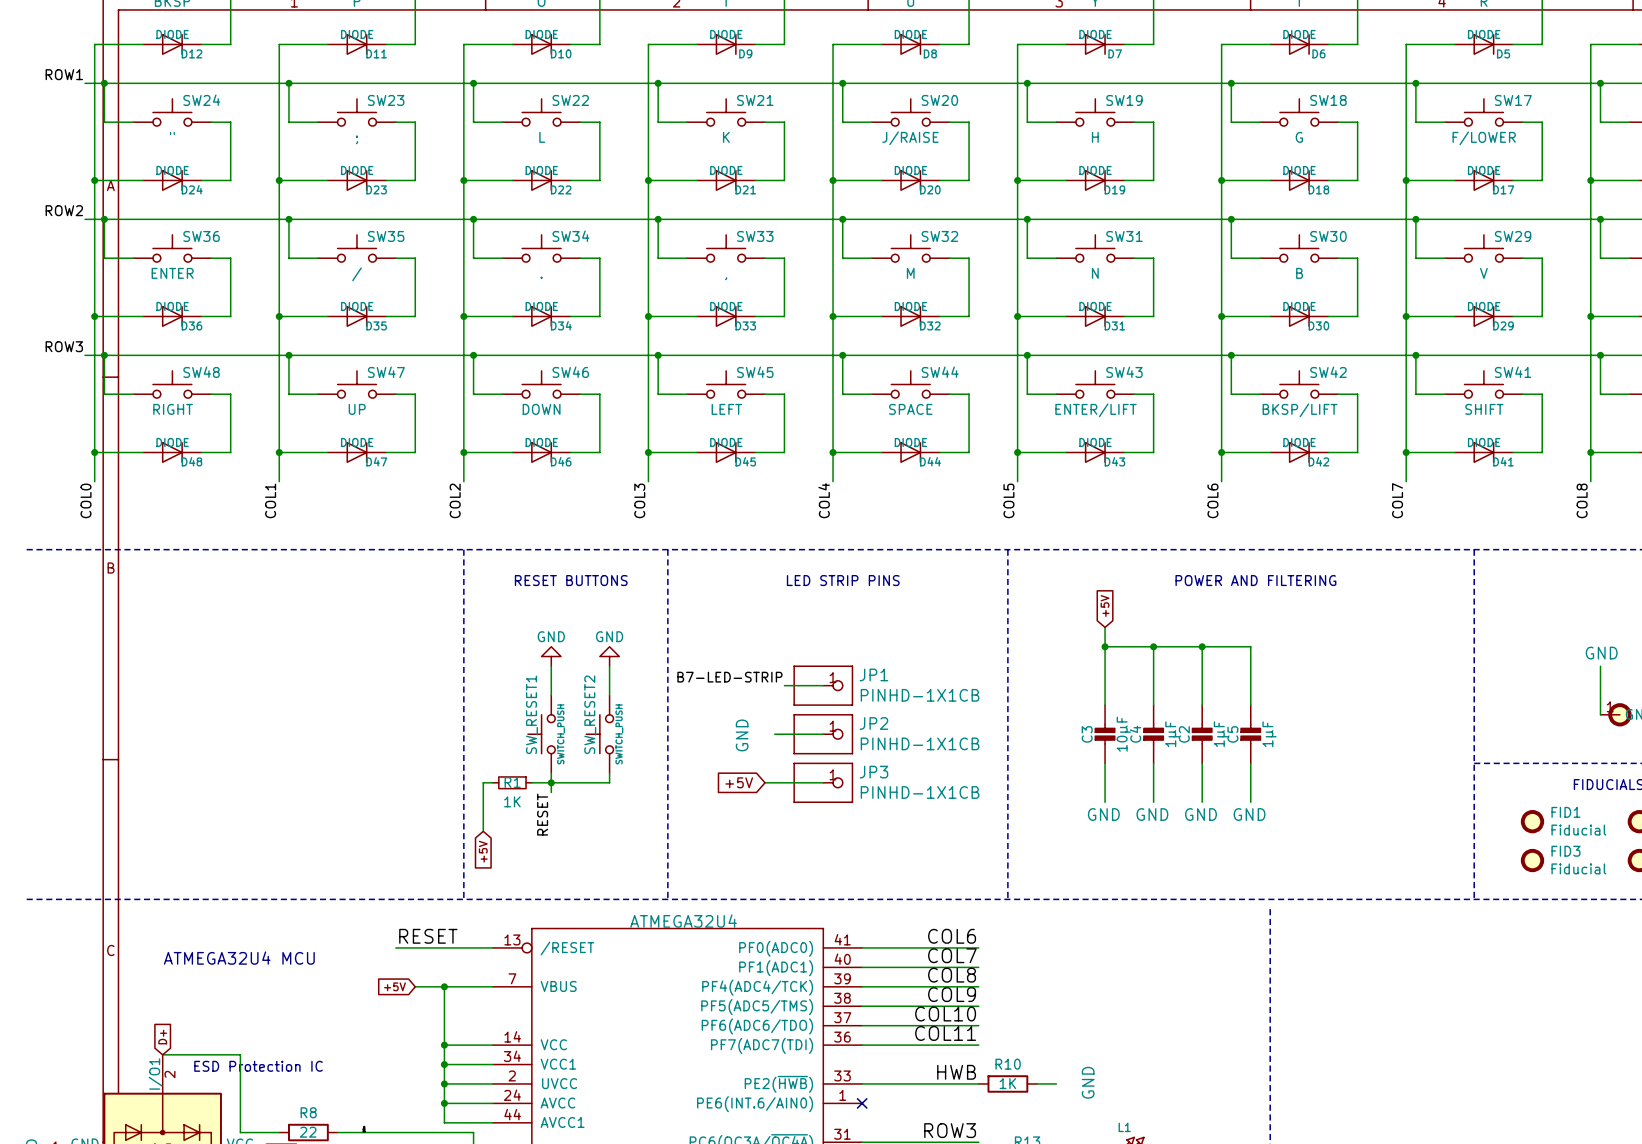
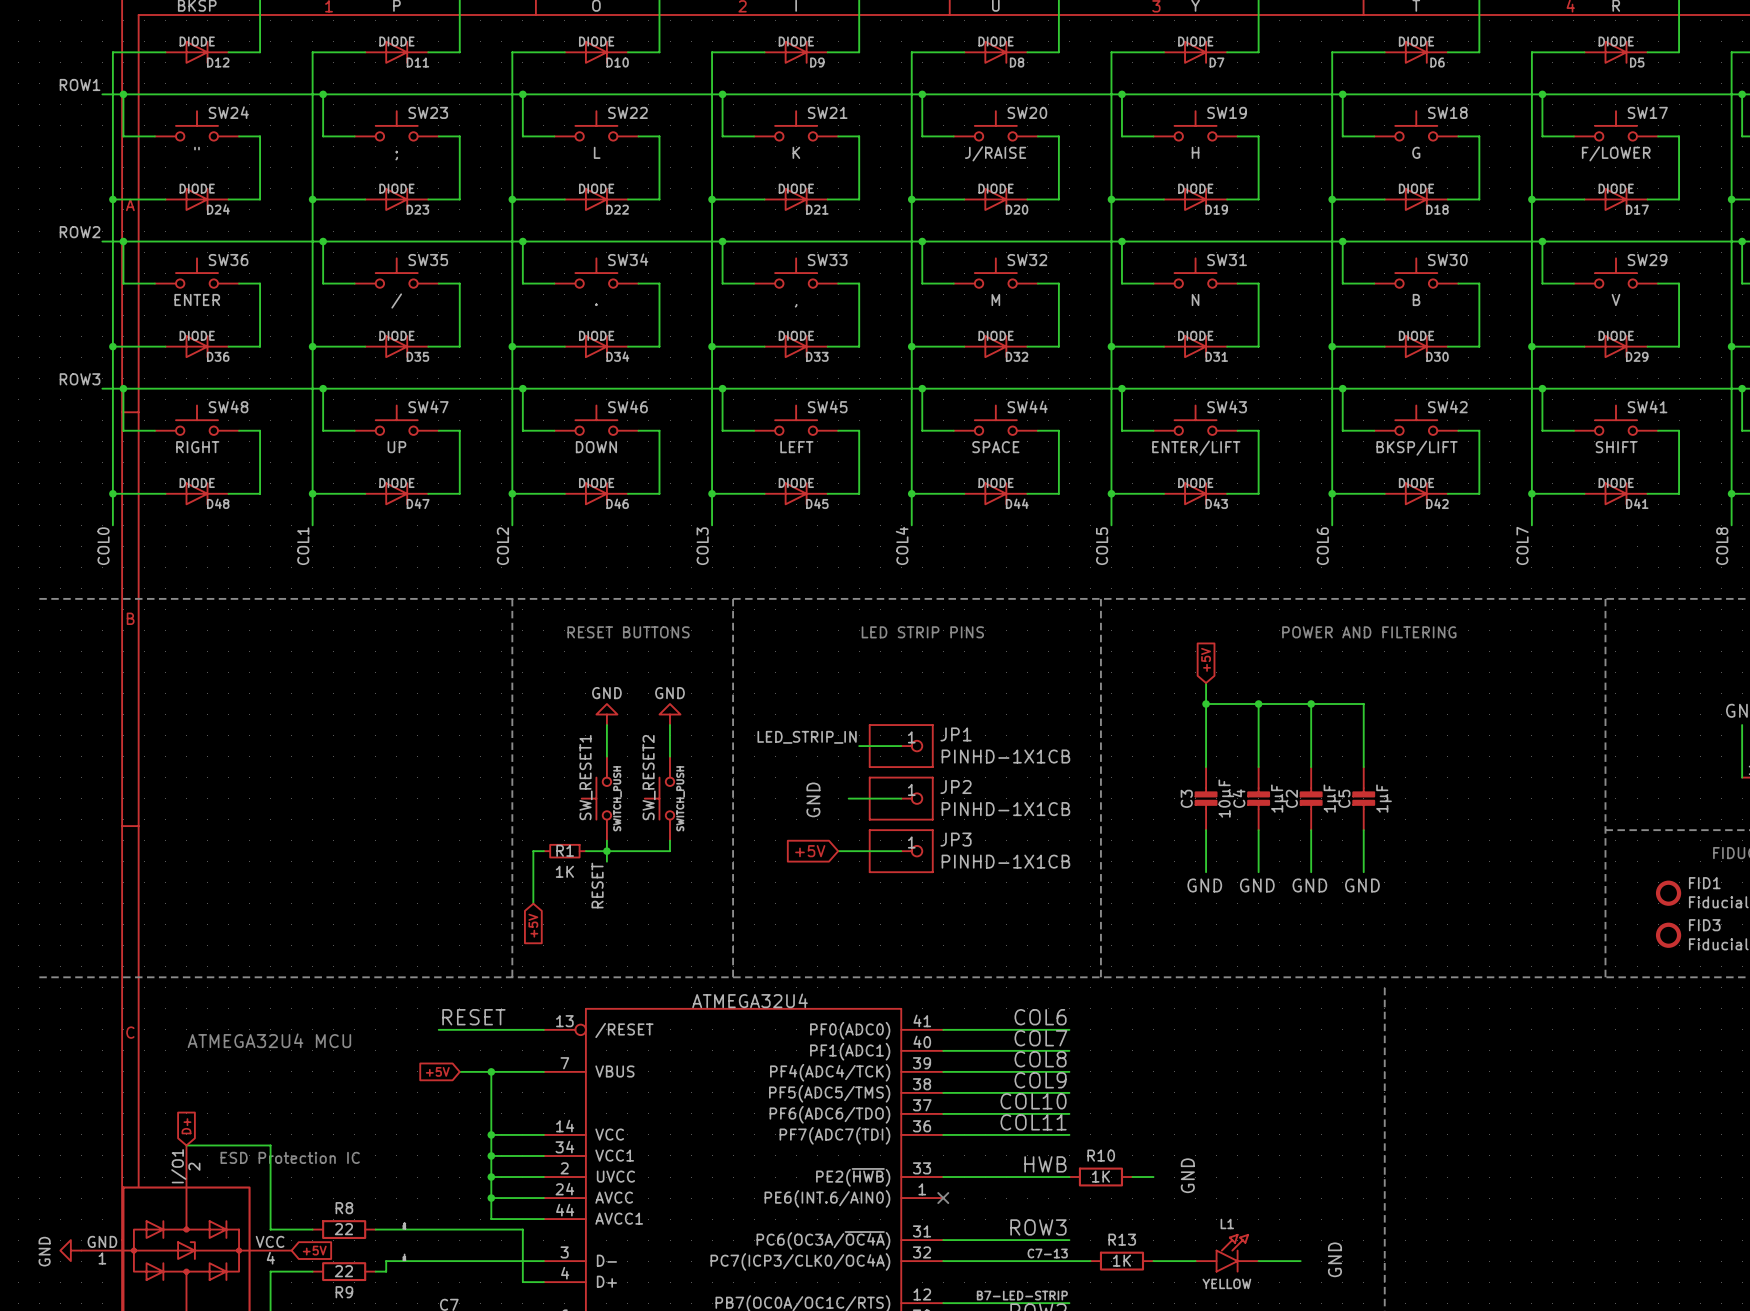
label: B7-LED-STRIP (729, 677) -> LED_STRIP_IN (807, 737)

